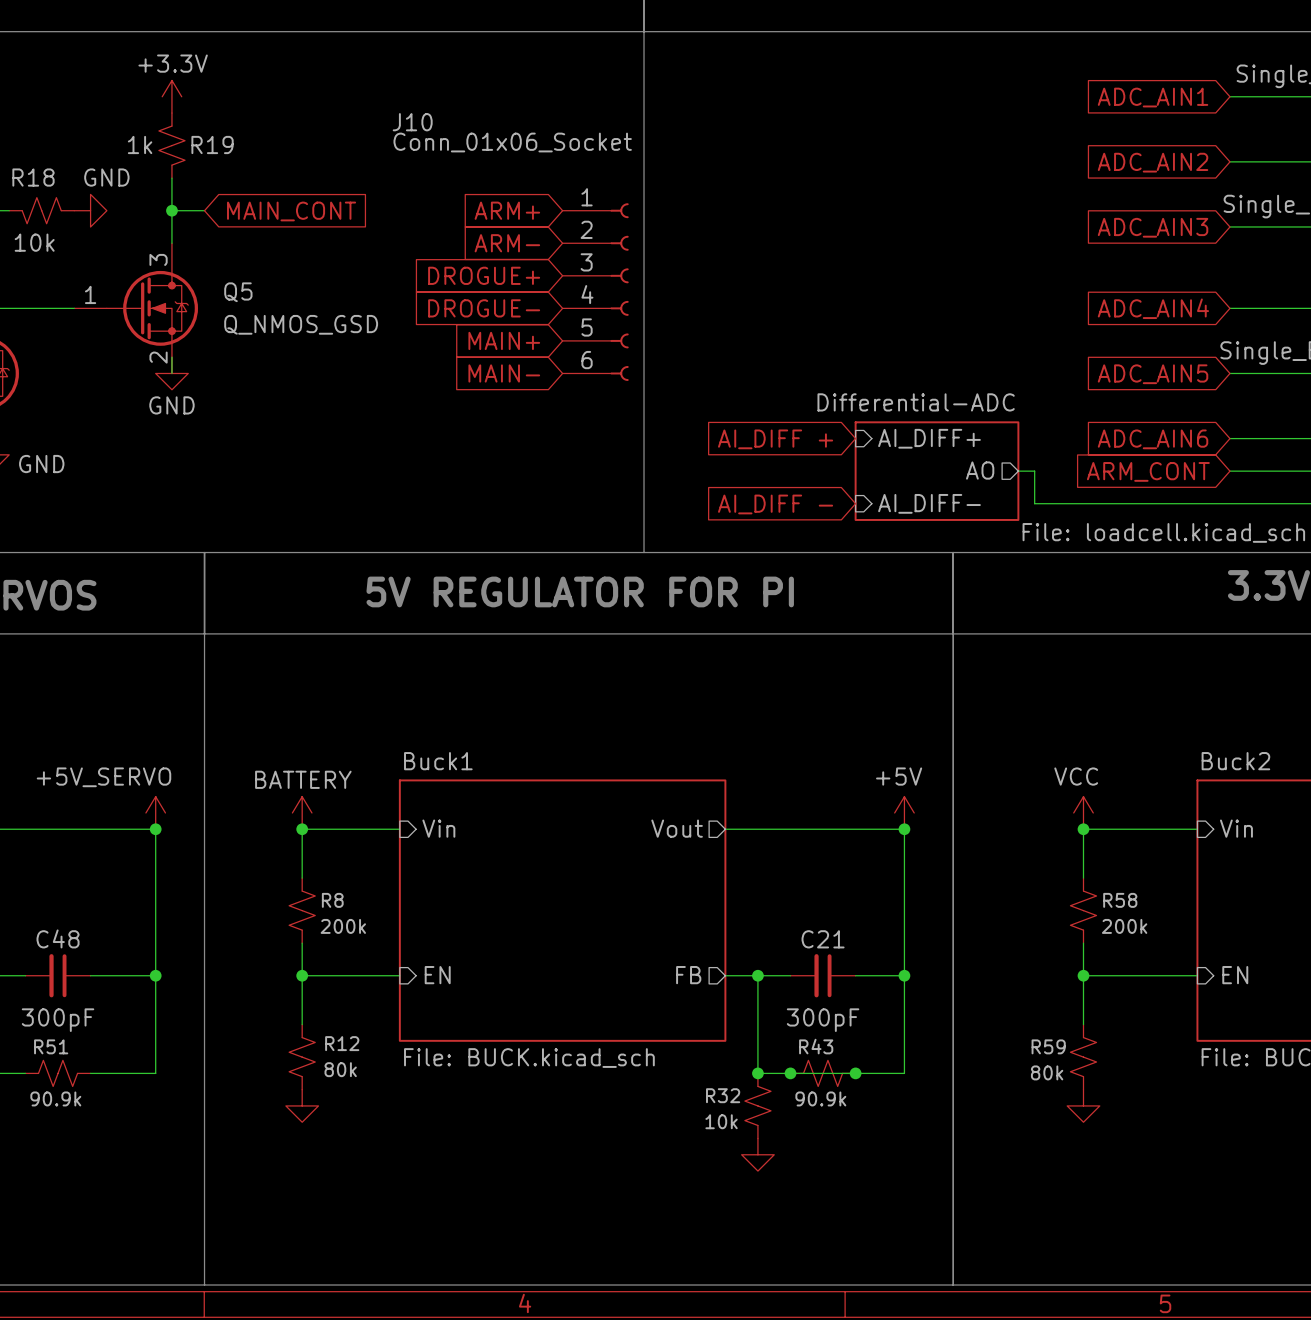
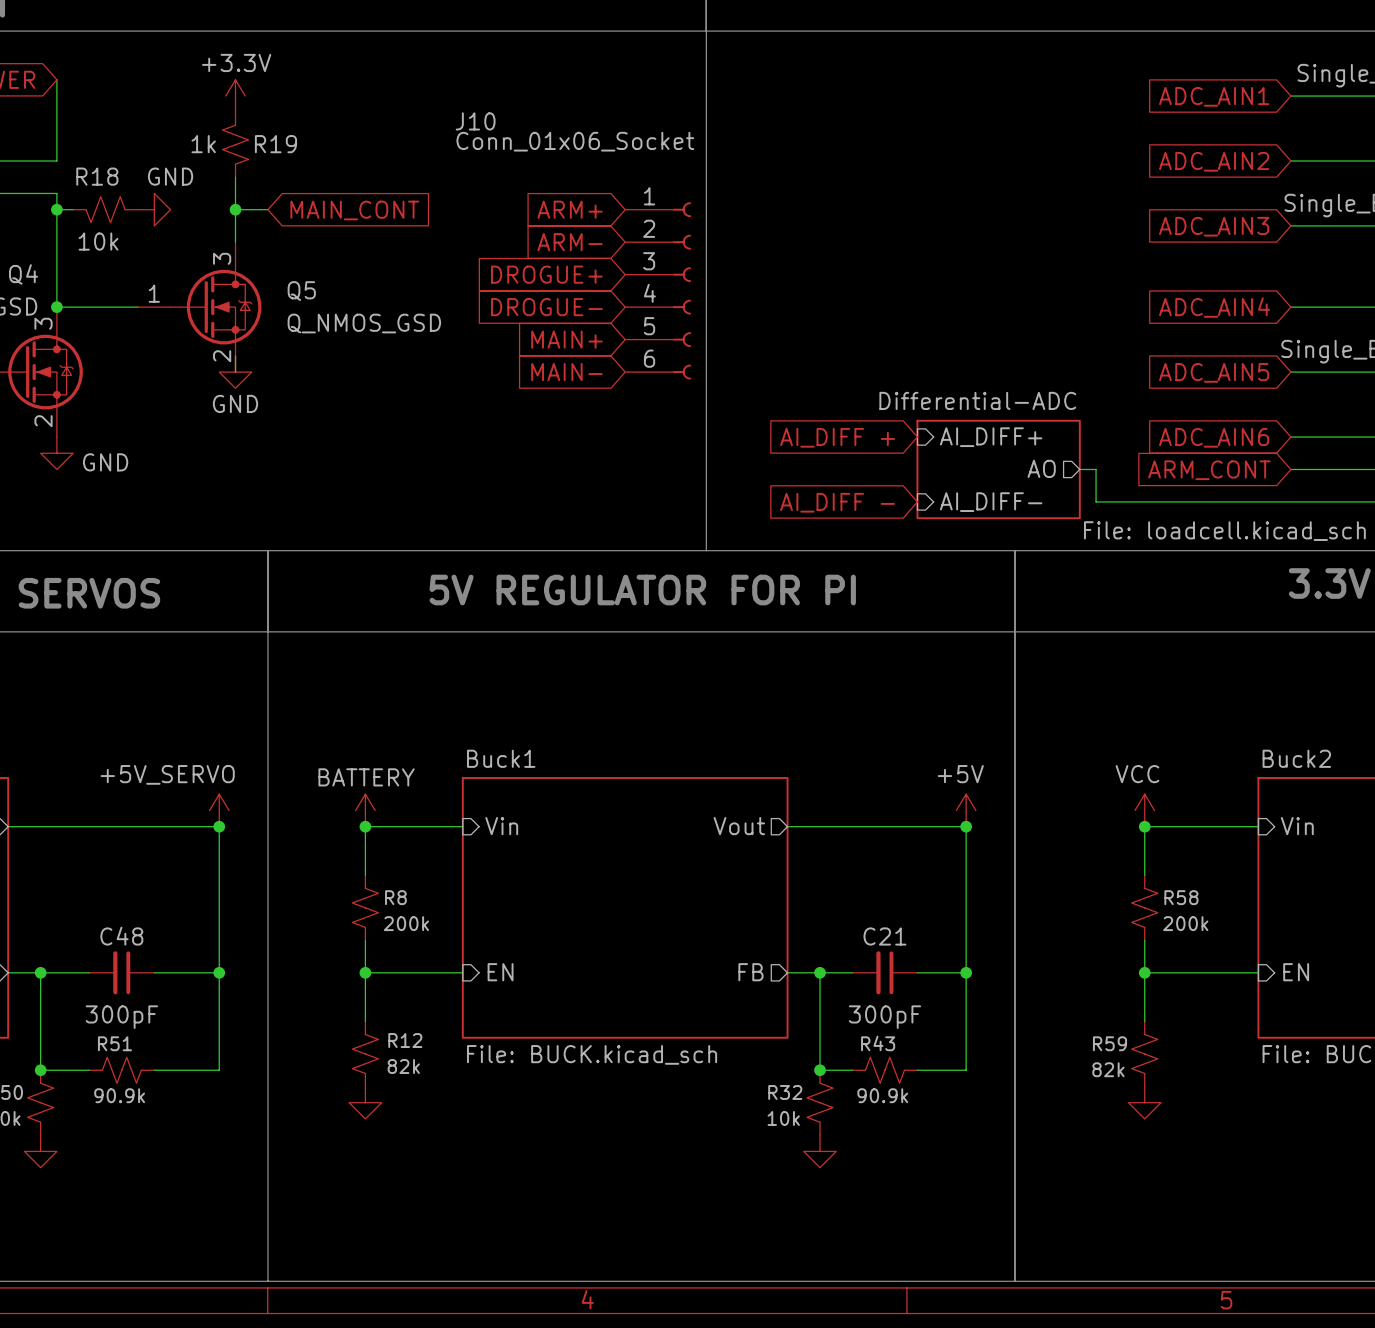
R12 value: 80k (340, 1069) -> 82k (403, 1066)
R59 value: 80k (1047, 1072) -> 82k (1108, 1069)
wire: (790, 1073) (855, 1073) -> none
junction: (790, 1073) -> none
junction: (855, 1073) -> none

